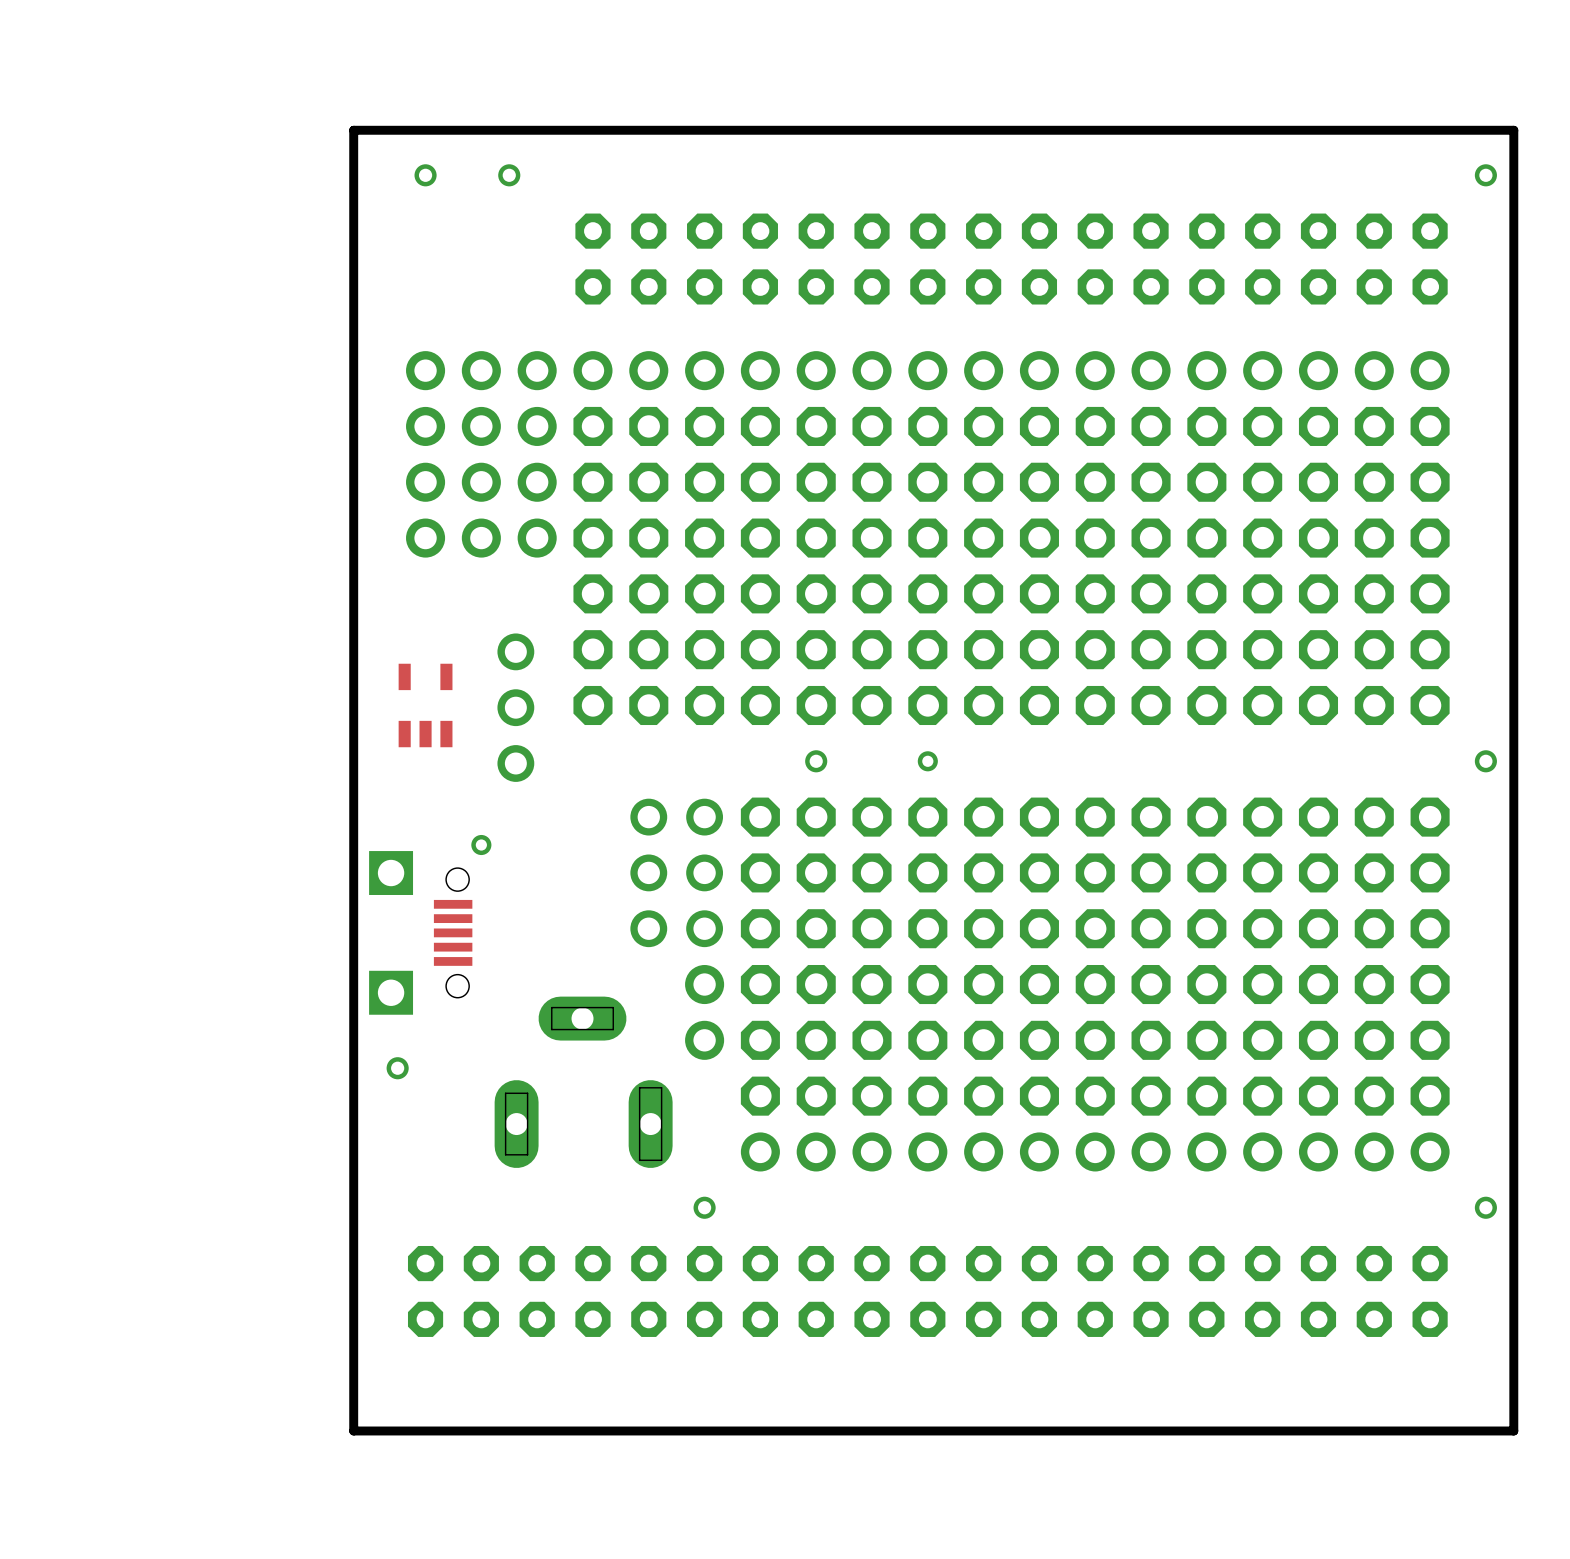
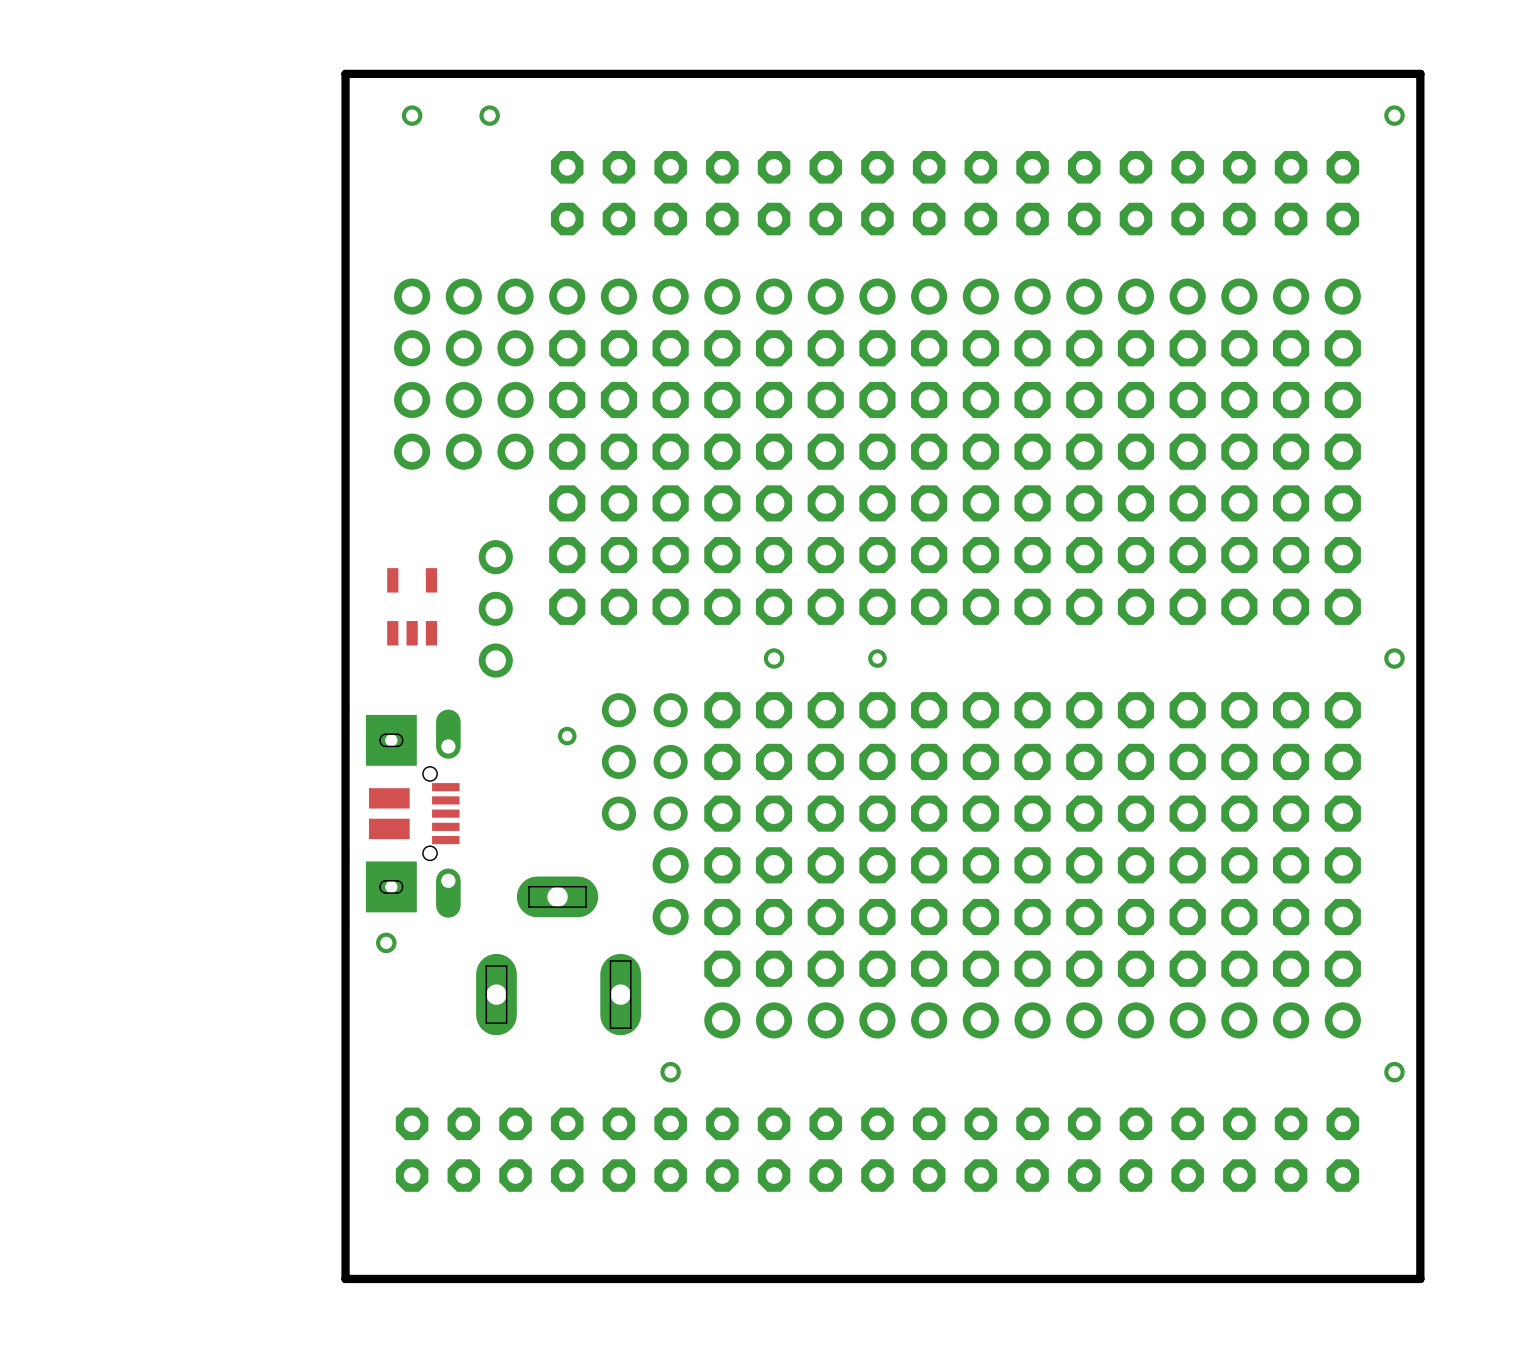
via position: (481, 845) -> (567, 736)
part footprint: [369, 851, 473, 1015] -> [365, 709, 461, 918]

